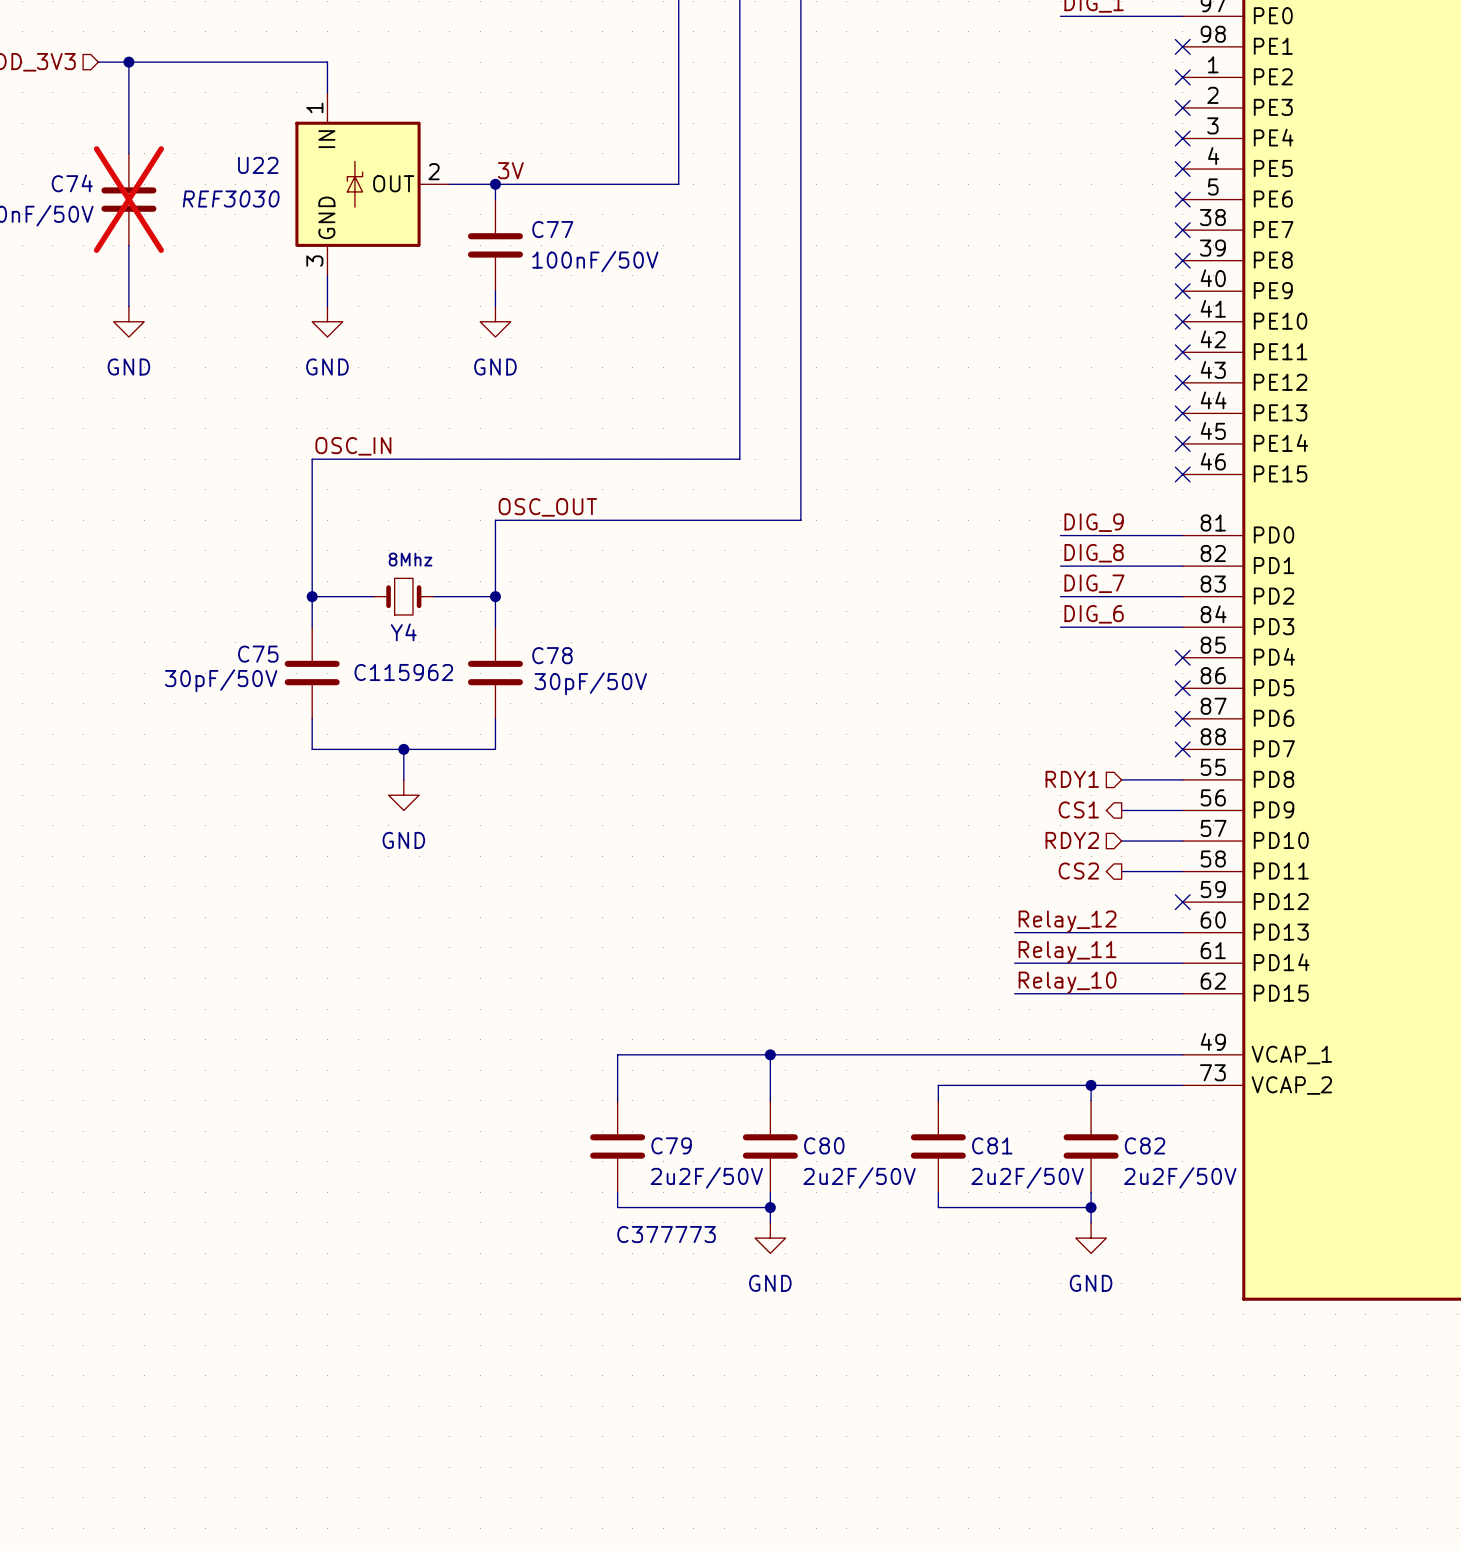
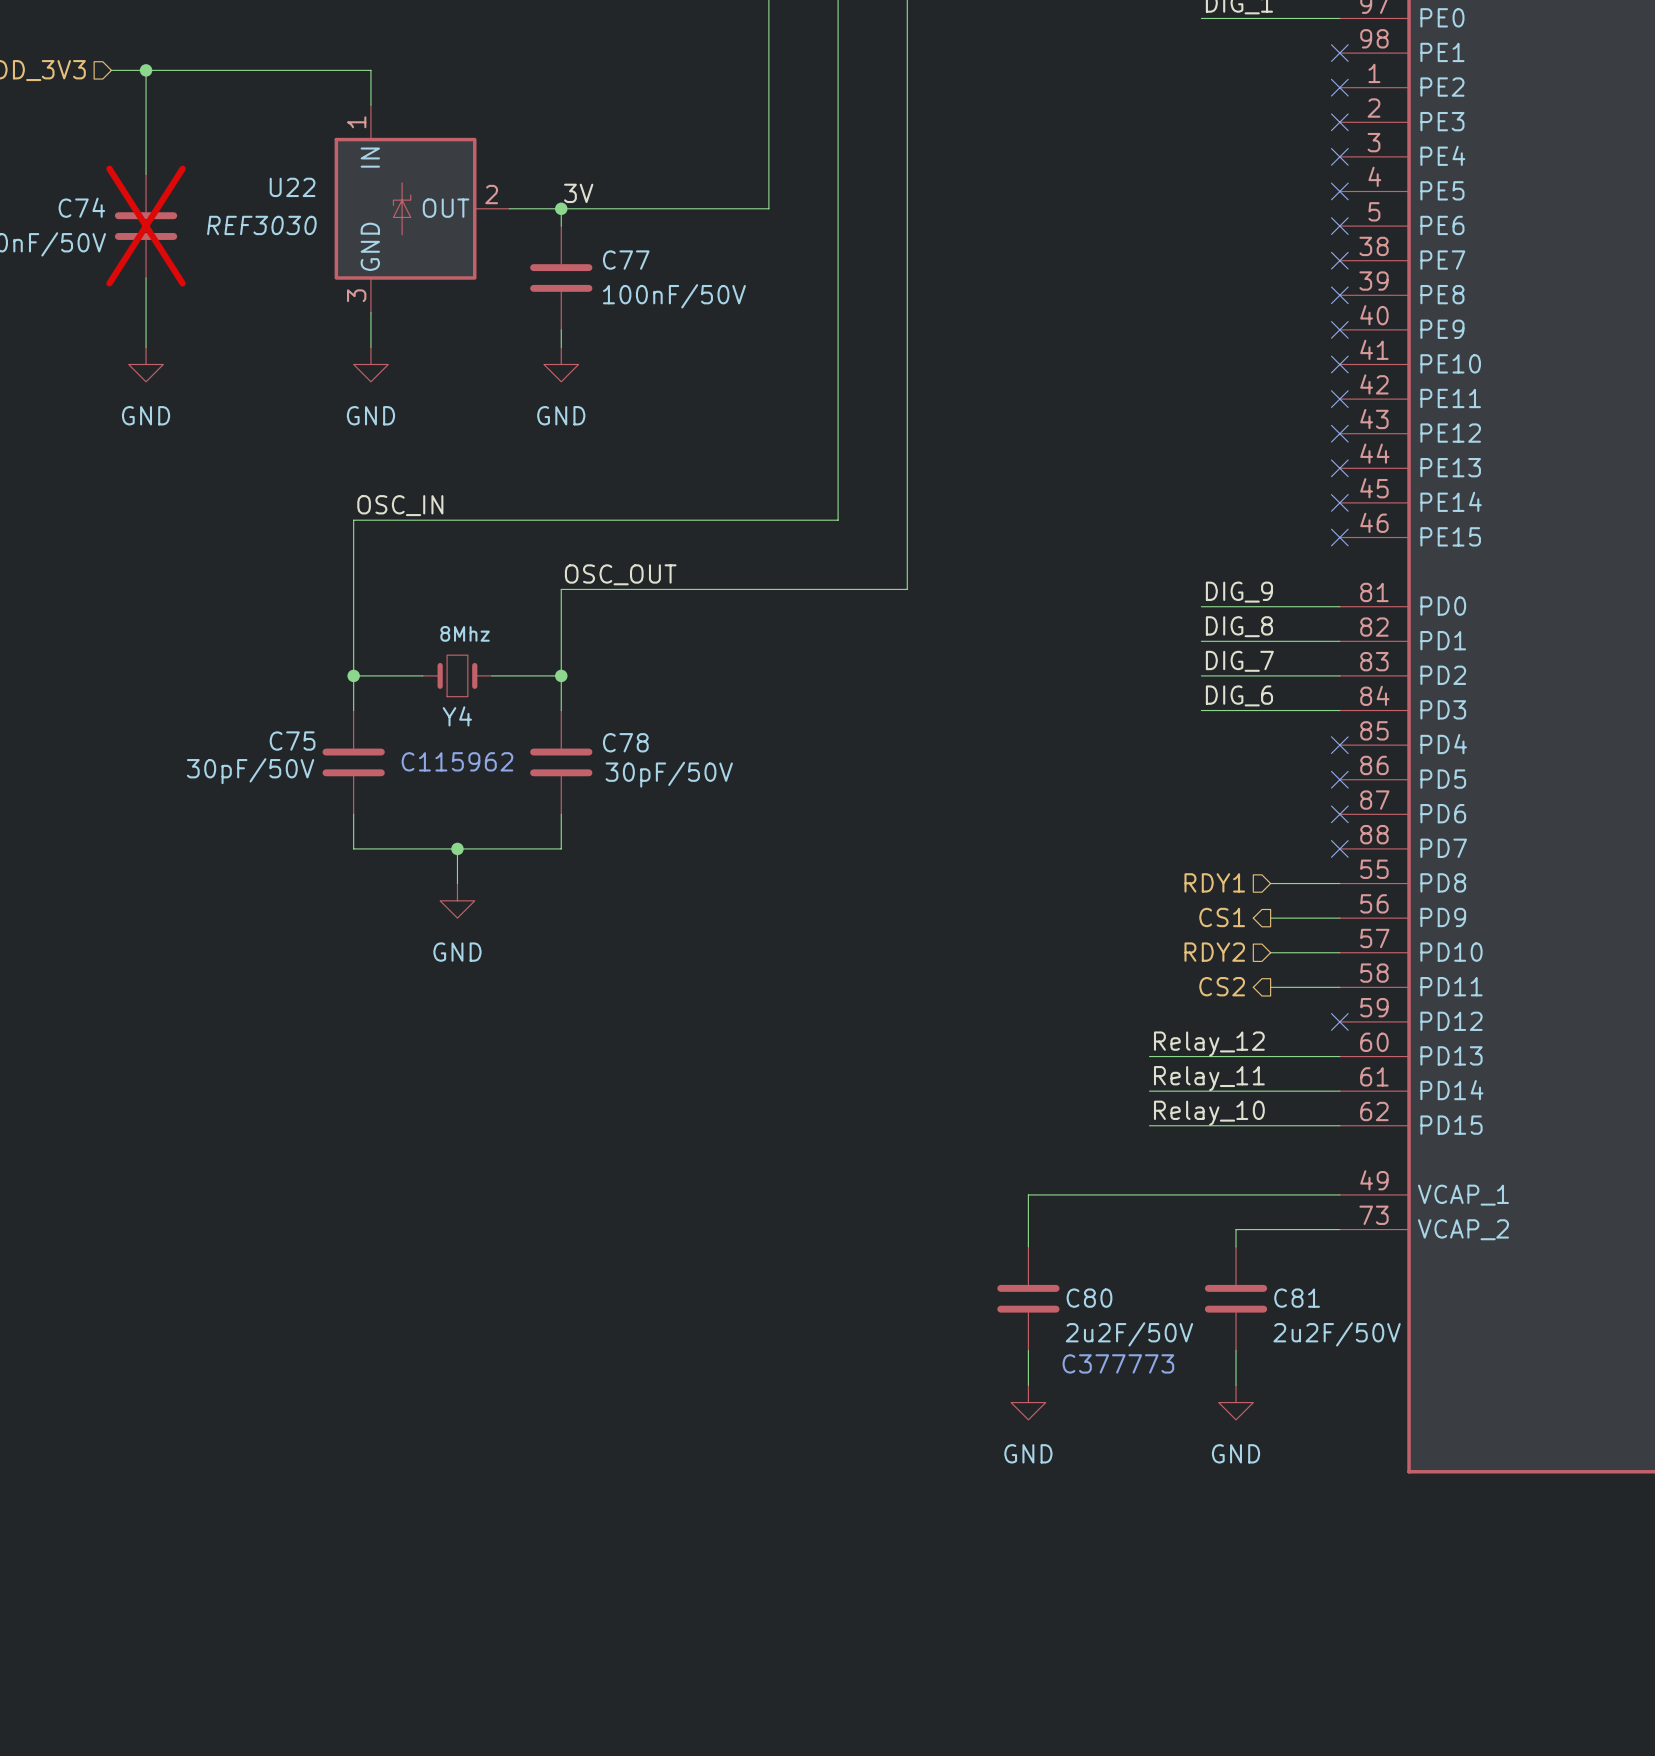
wire: (770, 1054) (770, 1100) -> none
junction: (770, 1054) -> none
wire: (907, 1054) (617, 1054) (617, 1100) -> (1028, 1194) (1028, 1246)
wire: (1091, 1085) (938, 1085) (938, 1100) -> none
junction: (1091, 1085) -> none
C82 name: C82 (1145, 1145) -> C81 (1297, 1298)
C79: 2u2F/50V (617, 1146) -> none
C80 position: (770, 1146) -> (1028, 1298)
C81: 2u2F/50V (938, 1146) -> none
wire: (617, 1192) (617, 1207) (770, 1207) -> none
wire: (770, 1192) (770, 1222) -> (1028, 1350) (1028, 1385)
wire: (938, 1192) (938, 1207) (1091, 1207) -> none
text: none -> C377773 (1118, 1363)
junction: (770, 1207) -> none
junction: (1091, 1207) -> none
text: C377773 (666, 1234) -> none
power symbol position: GND (770, 1238) -> GND (1028, 1402)

